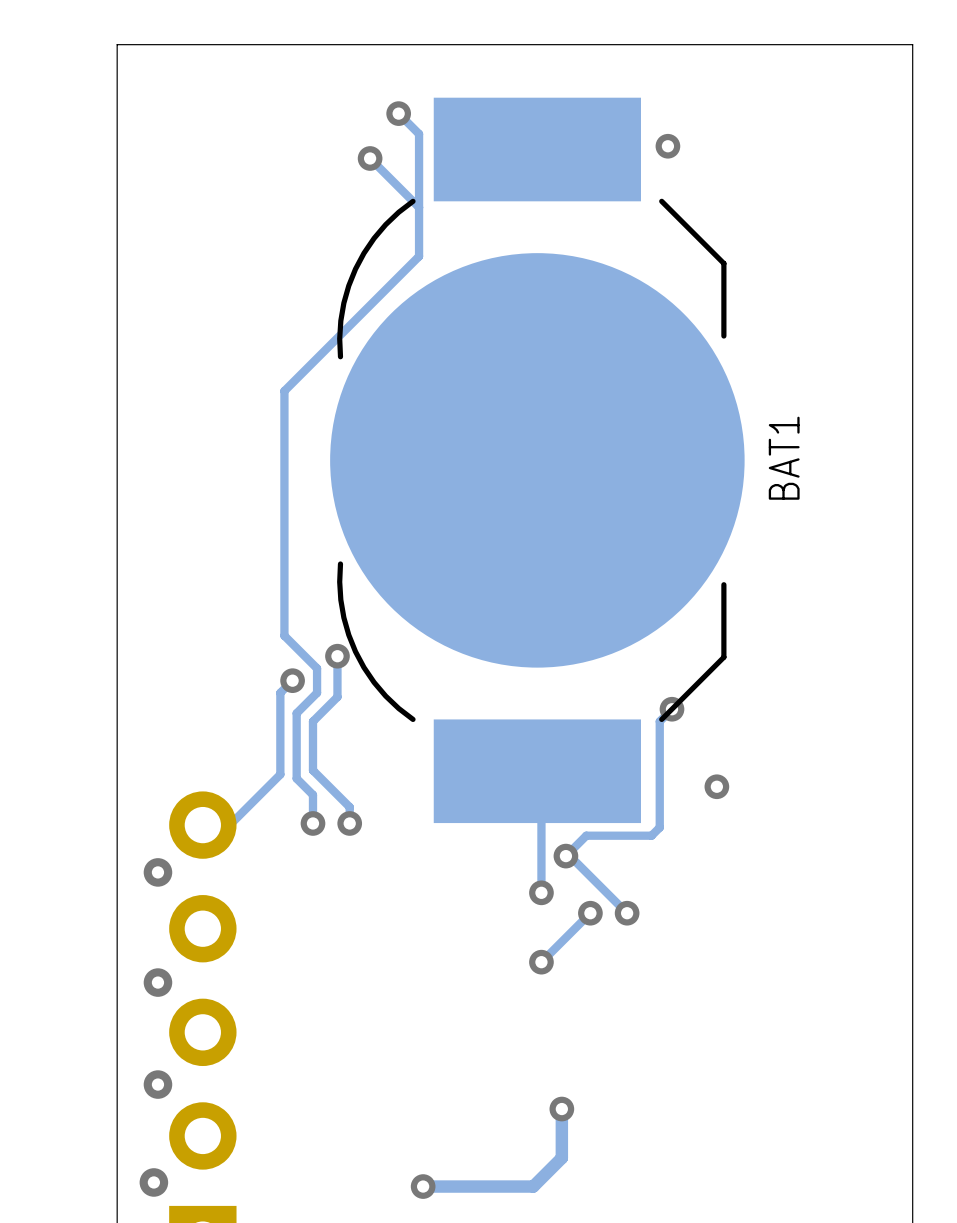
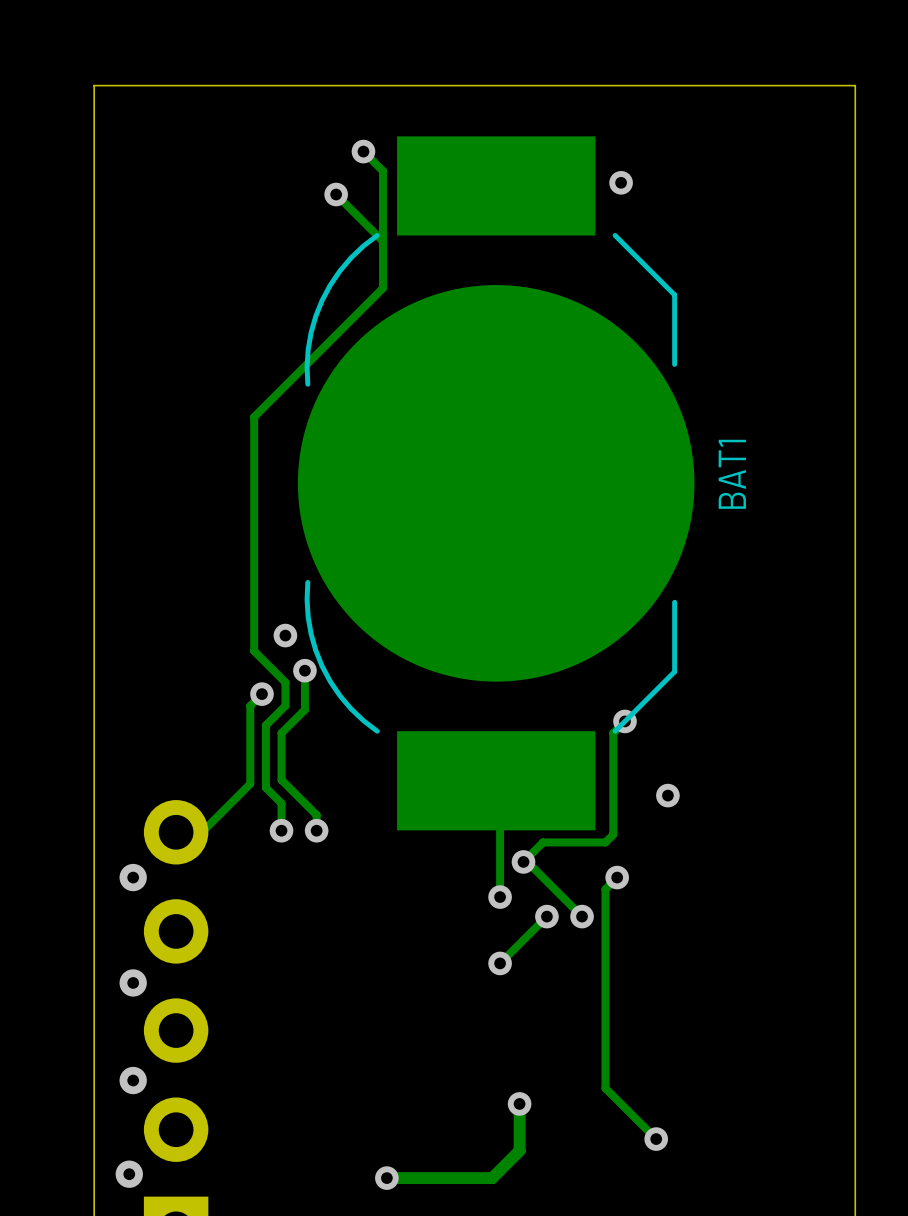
via: none -> (285, 635)
track: none -> (617, 877) (605, 889) (605, 1088) (656, 1139)
via: none -> (617, 877)
via: none -> (656, 1139)

